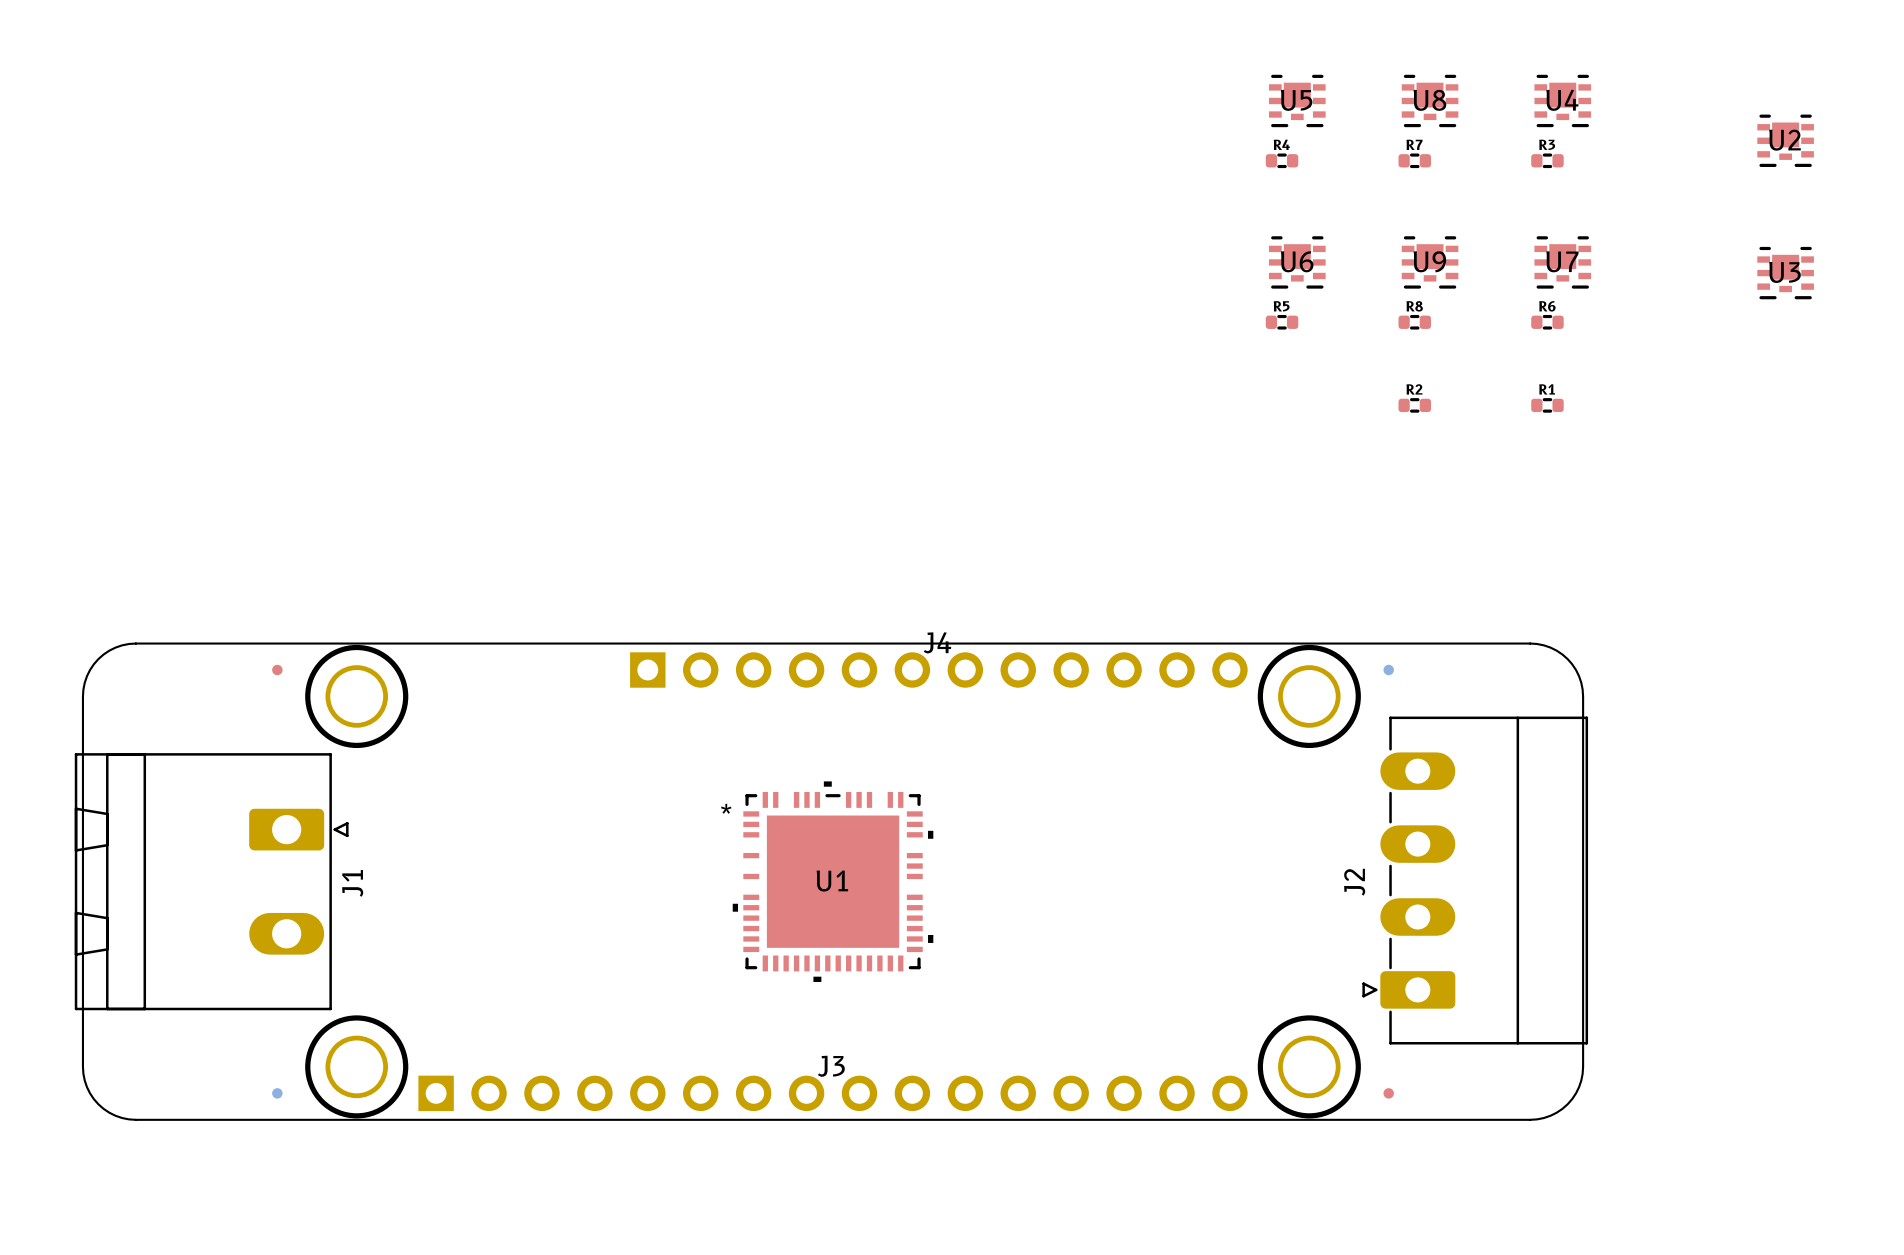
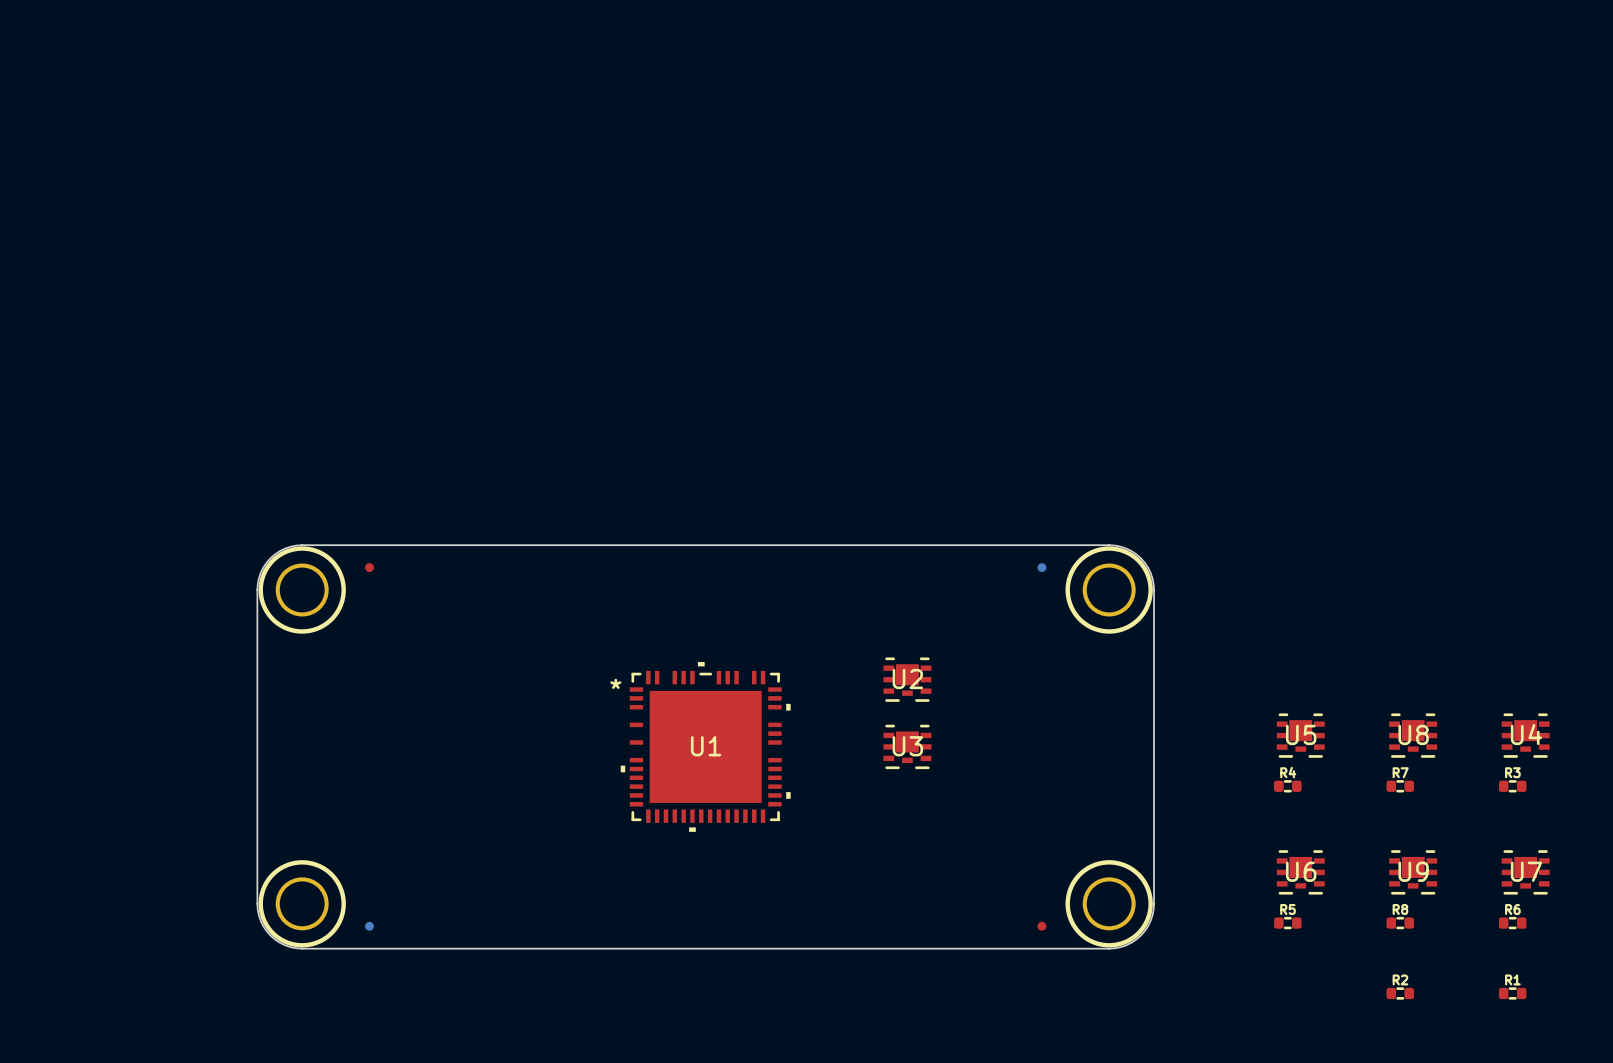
U5 position: (1297, 100) -> (1300, 735)
U8 position: (1430, 100) -> (1413, 735)
U4 position: (1562, 100) -> (1525, 735)
U2 position: (1785, 140) -> (907, 679)
R4 position: (1282, 160) -> (1287, 786)
R7 position: (1414, 160) -> (1400, 786)
R3 position: (1547, 160) -> (1512, 786)
U6 position: (1297, 262) -> (1300, 872)
U9 position: (1430, 262) -> (1413, 872)
U7 position: (1562, 262) -> (1525, 872)
U3 position: (1785, 273) -> (907, 746)
R5 position: (1282, 322) -> (1287, 923)
R8 position: (1414, 322) -> (1400, 923)
R6 position: (1547, 322) -> (1512, 923)
R2 position: (1414, 405) -> (1400, 993)
R1 position: (1547, 405) -> (1512, 993)
board edge: (356, 643) (128, 643) (115, 647) (98, 659) (86, 676) (82, 696) (82, 1066) (84, 1080) (90, 1093) (98, 1104) (109, 1112) (128, 1119) (356, 1119) -> (302, 545) (285, 548) (270, 558) (260, 572) (257, 590) (257, 909) (260, 920) (270, 935) (285, 945) (302, 948)
board edge: (1309, 643) (1537, 643) (1556, 650) (1572, 664) (1581, 682) (1583, 696) (1583, 1066) (1581, 1080) (1576, 1093) (1567, 1104) (1556, 1112) (1537, 1119) (1309, 1119) -> (1109, 545) (1126, 548) (1140, 558) (1150, 572) (1154, 590) (1153, 909) (1150, 920) (1140, 935) (1126, 945) (1109, 948)
part position: (277, 670) -> (369, 567)
J4: (938, 670) -> none
part position: (1388, 670) -> (1041, 567)
J2: (1475, 880) -> none
J1: (211, 881) -> none
part position: (277, 1093) -> (369, 926)
J3: (833, 1093) -> none
part position: (1388, 1093) -> (1041, 926)

